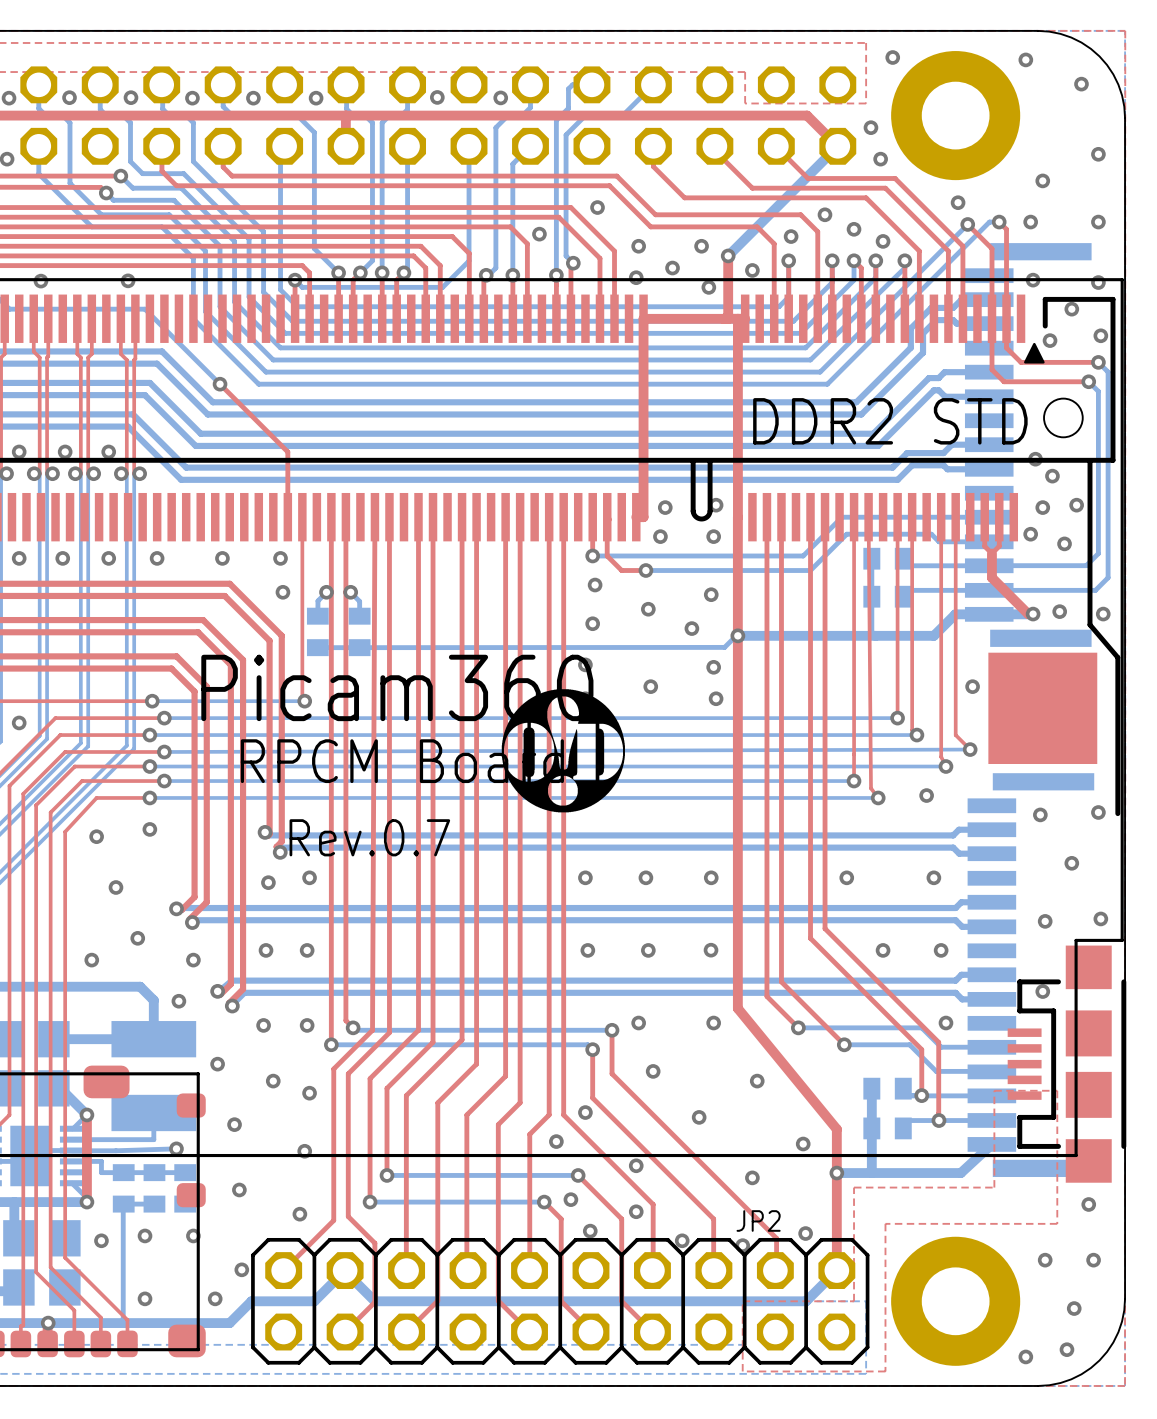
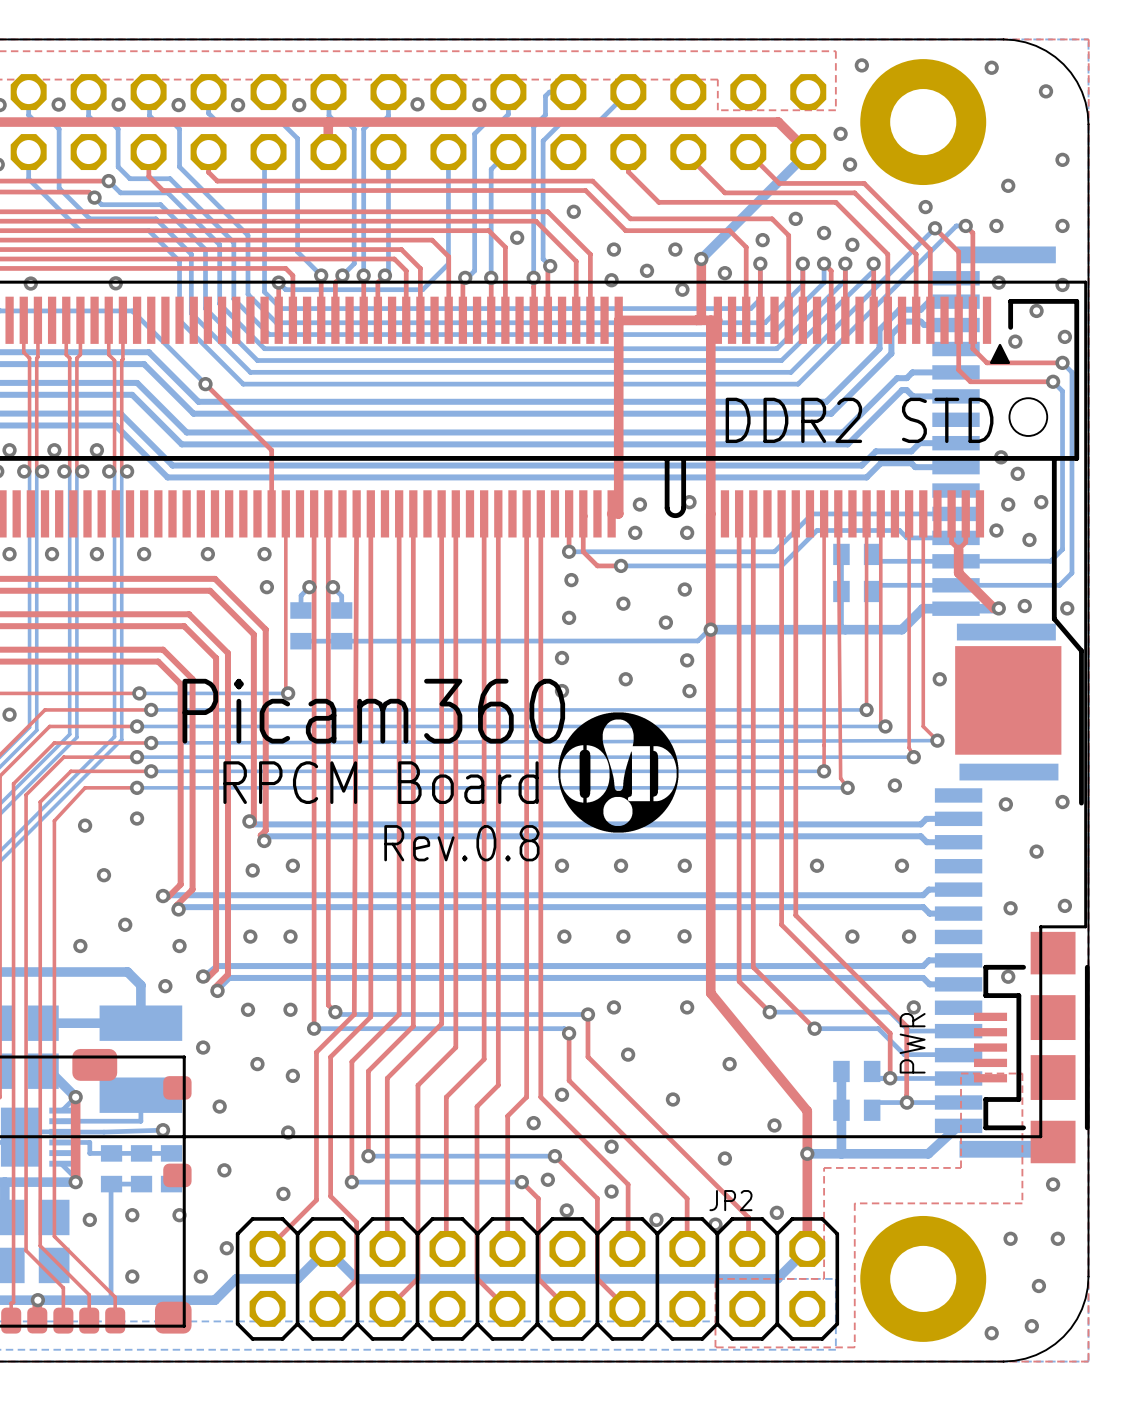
text position: Picam360 (397, 687) -> Picam360 (373, 711)
drawing position: (563, 750) -> (618, 772)
text position: RPCM Board (402, 761) -> RPCM Board (381, 782)
text: Rev.0.7 (369, 837) -> Rev.0.8 (461, 843)
text: none -> PWR (912, 1043)

